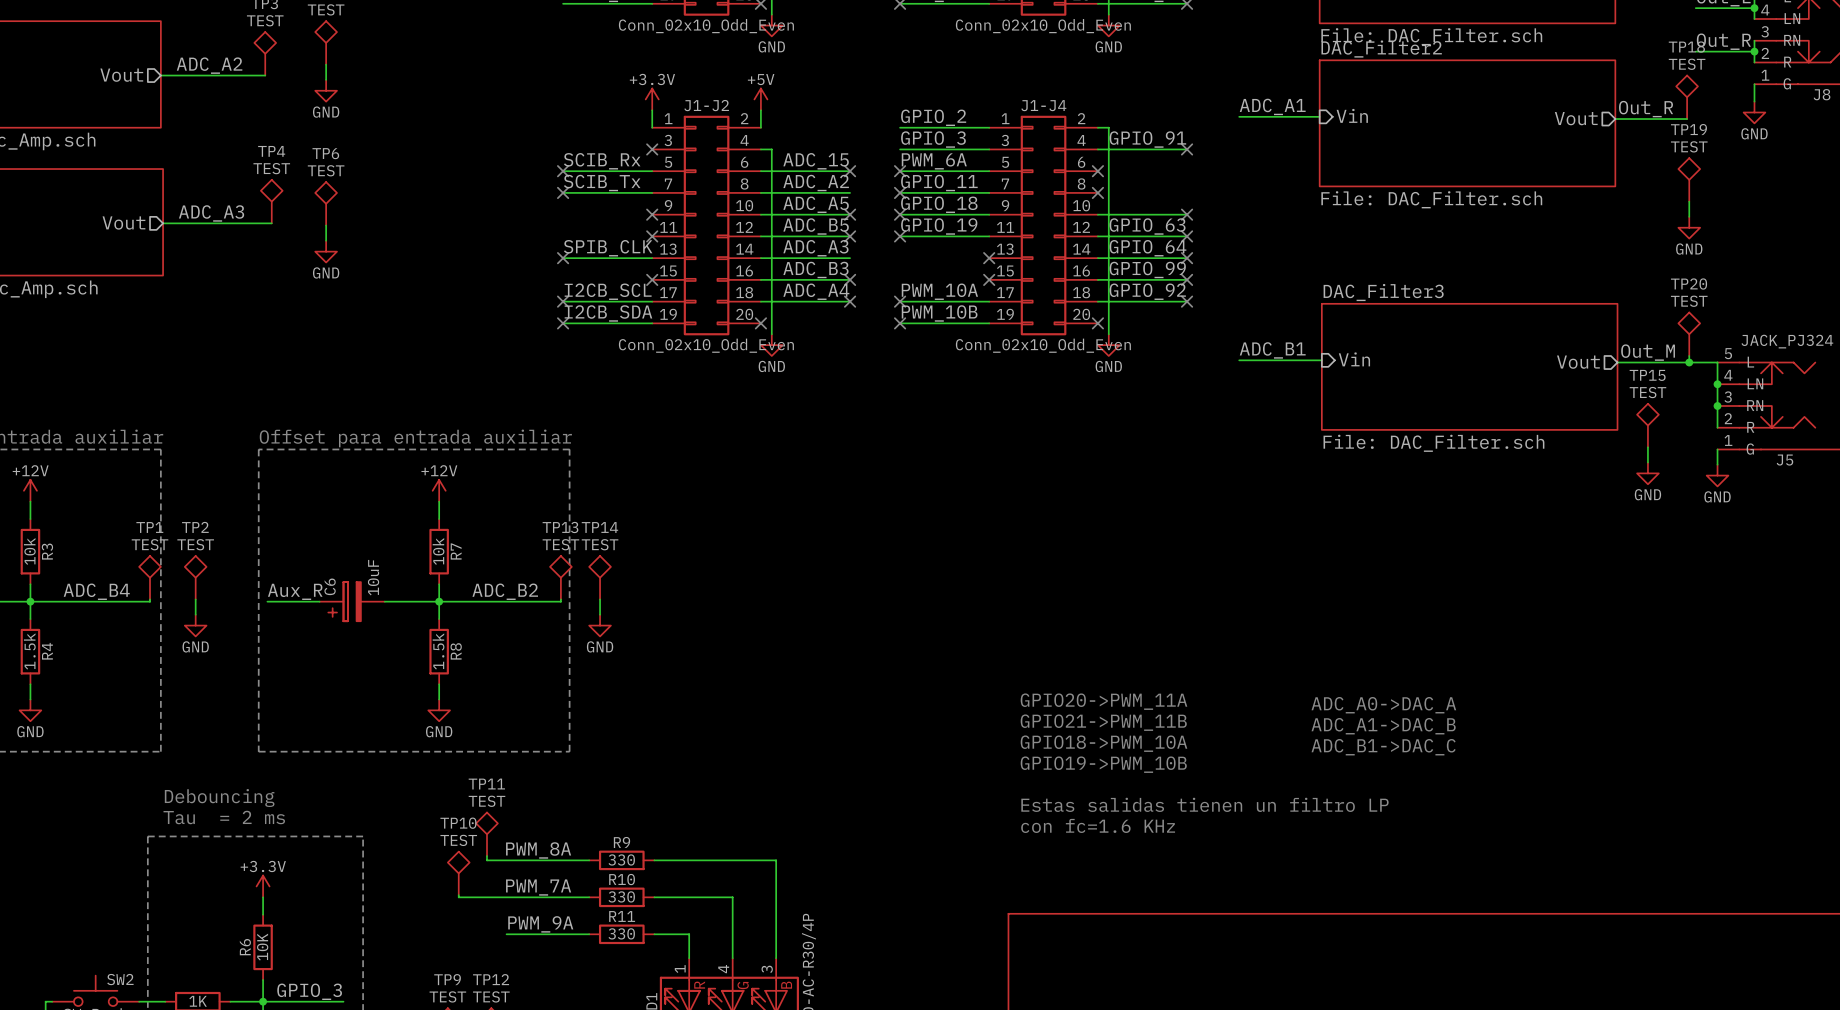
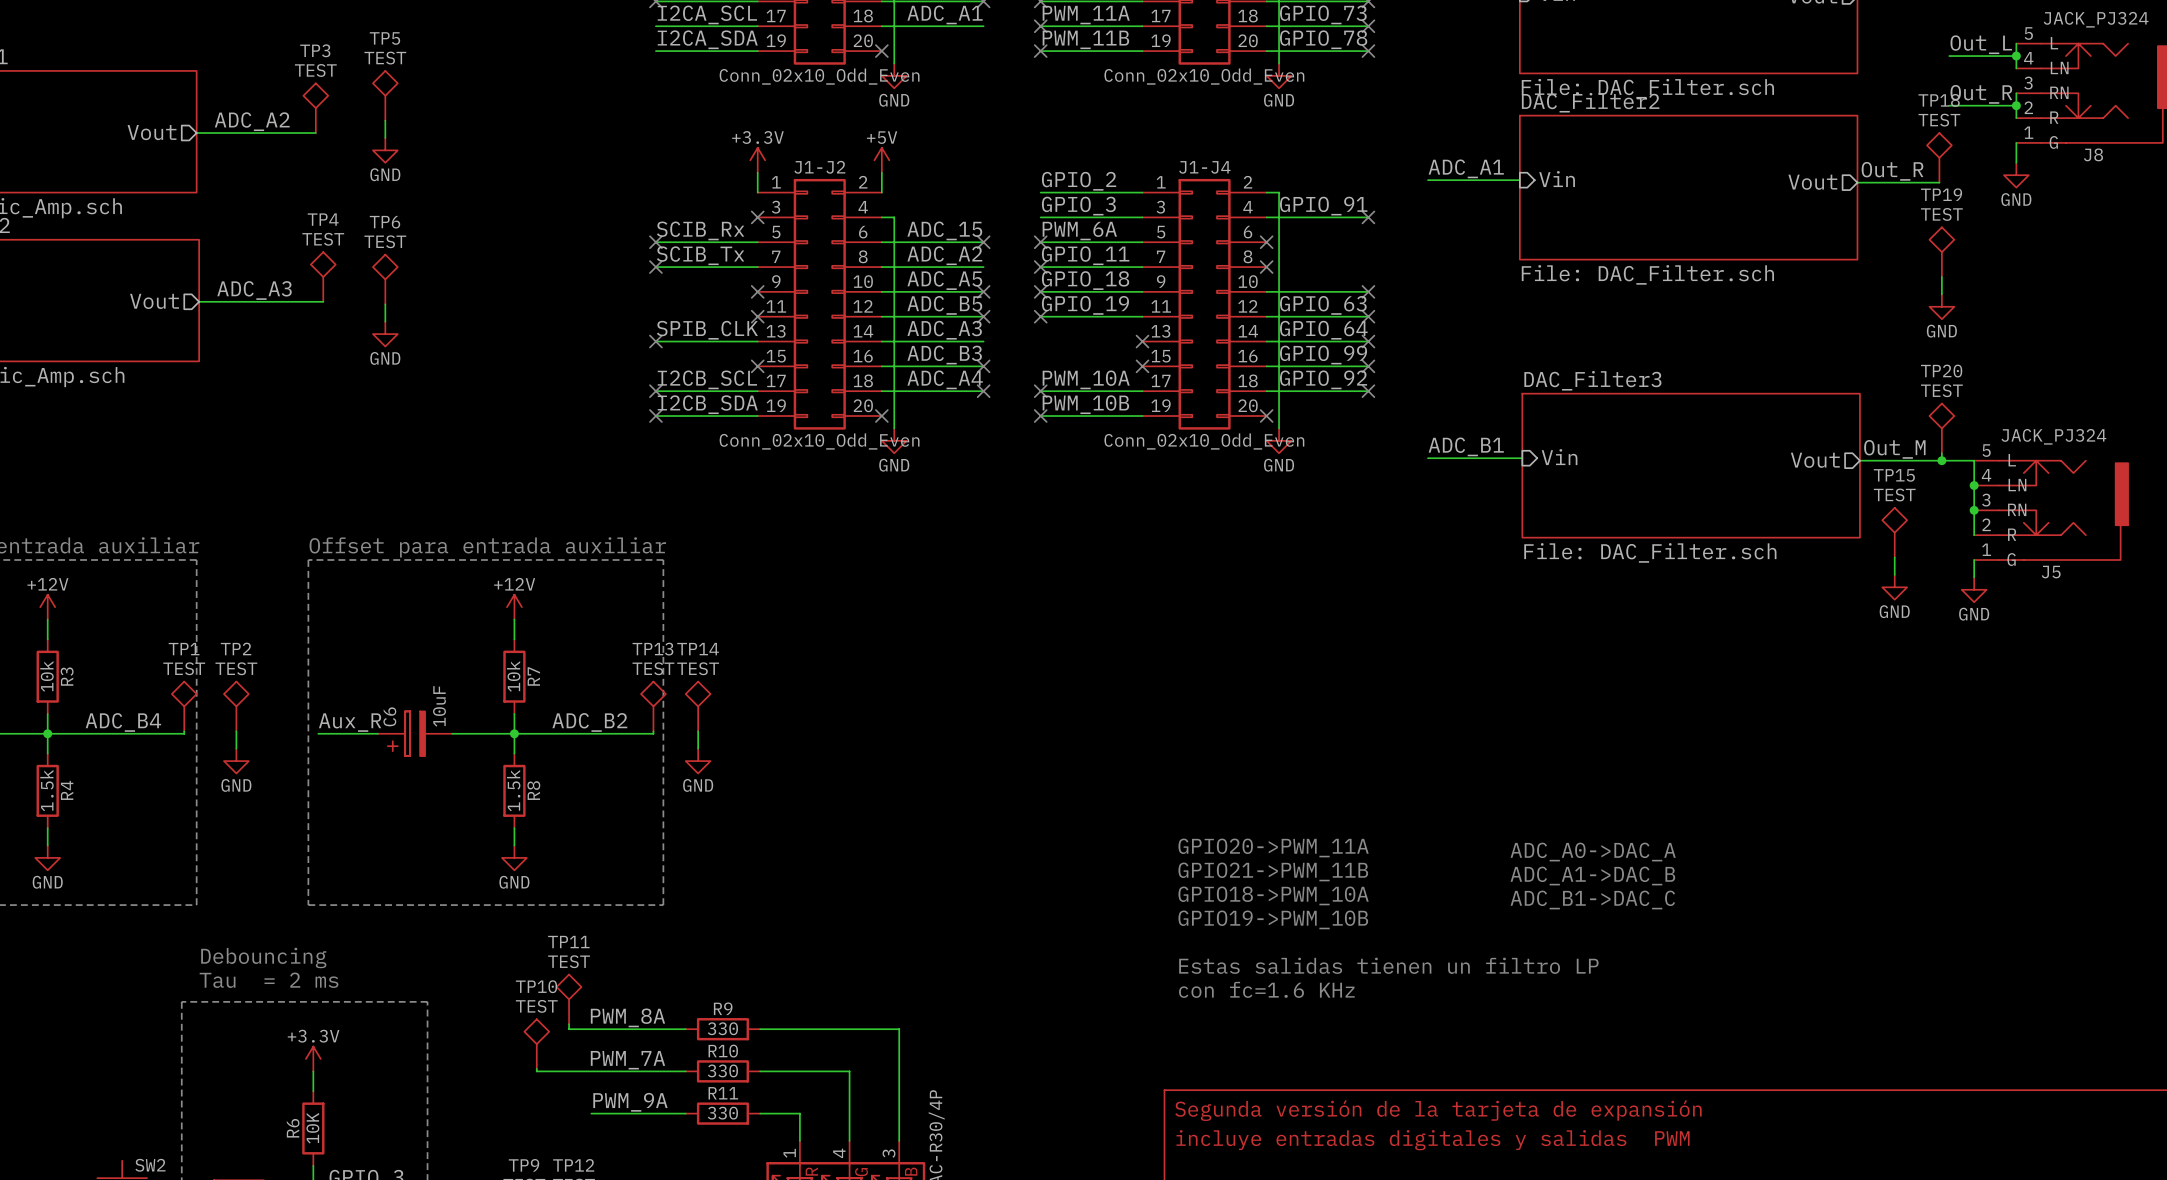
title block: none -> Segunda versión de la tarjeta de expansión (1438, 1110)
title block: none -> incluye entradas digitales y salidas PWM (1433, 1140)

